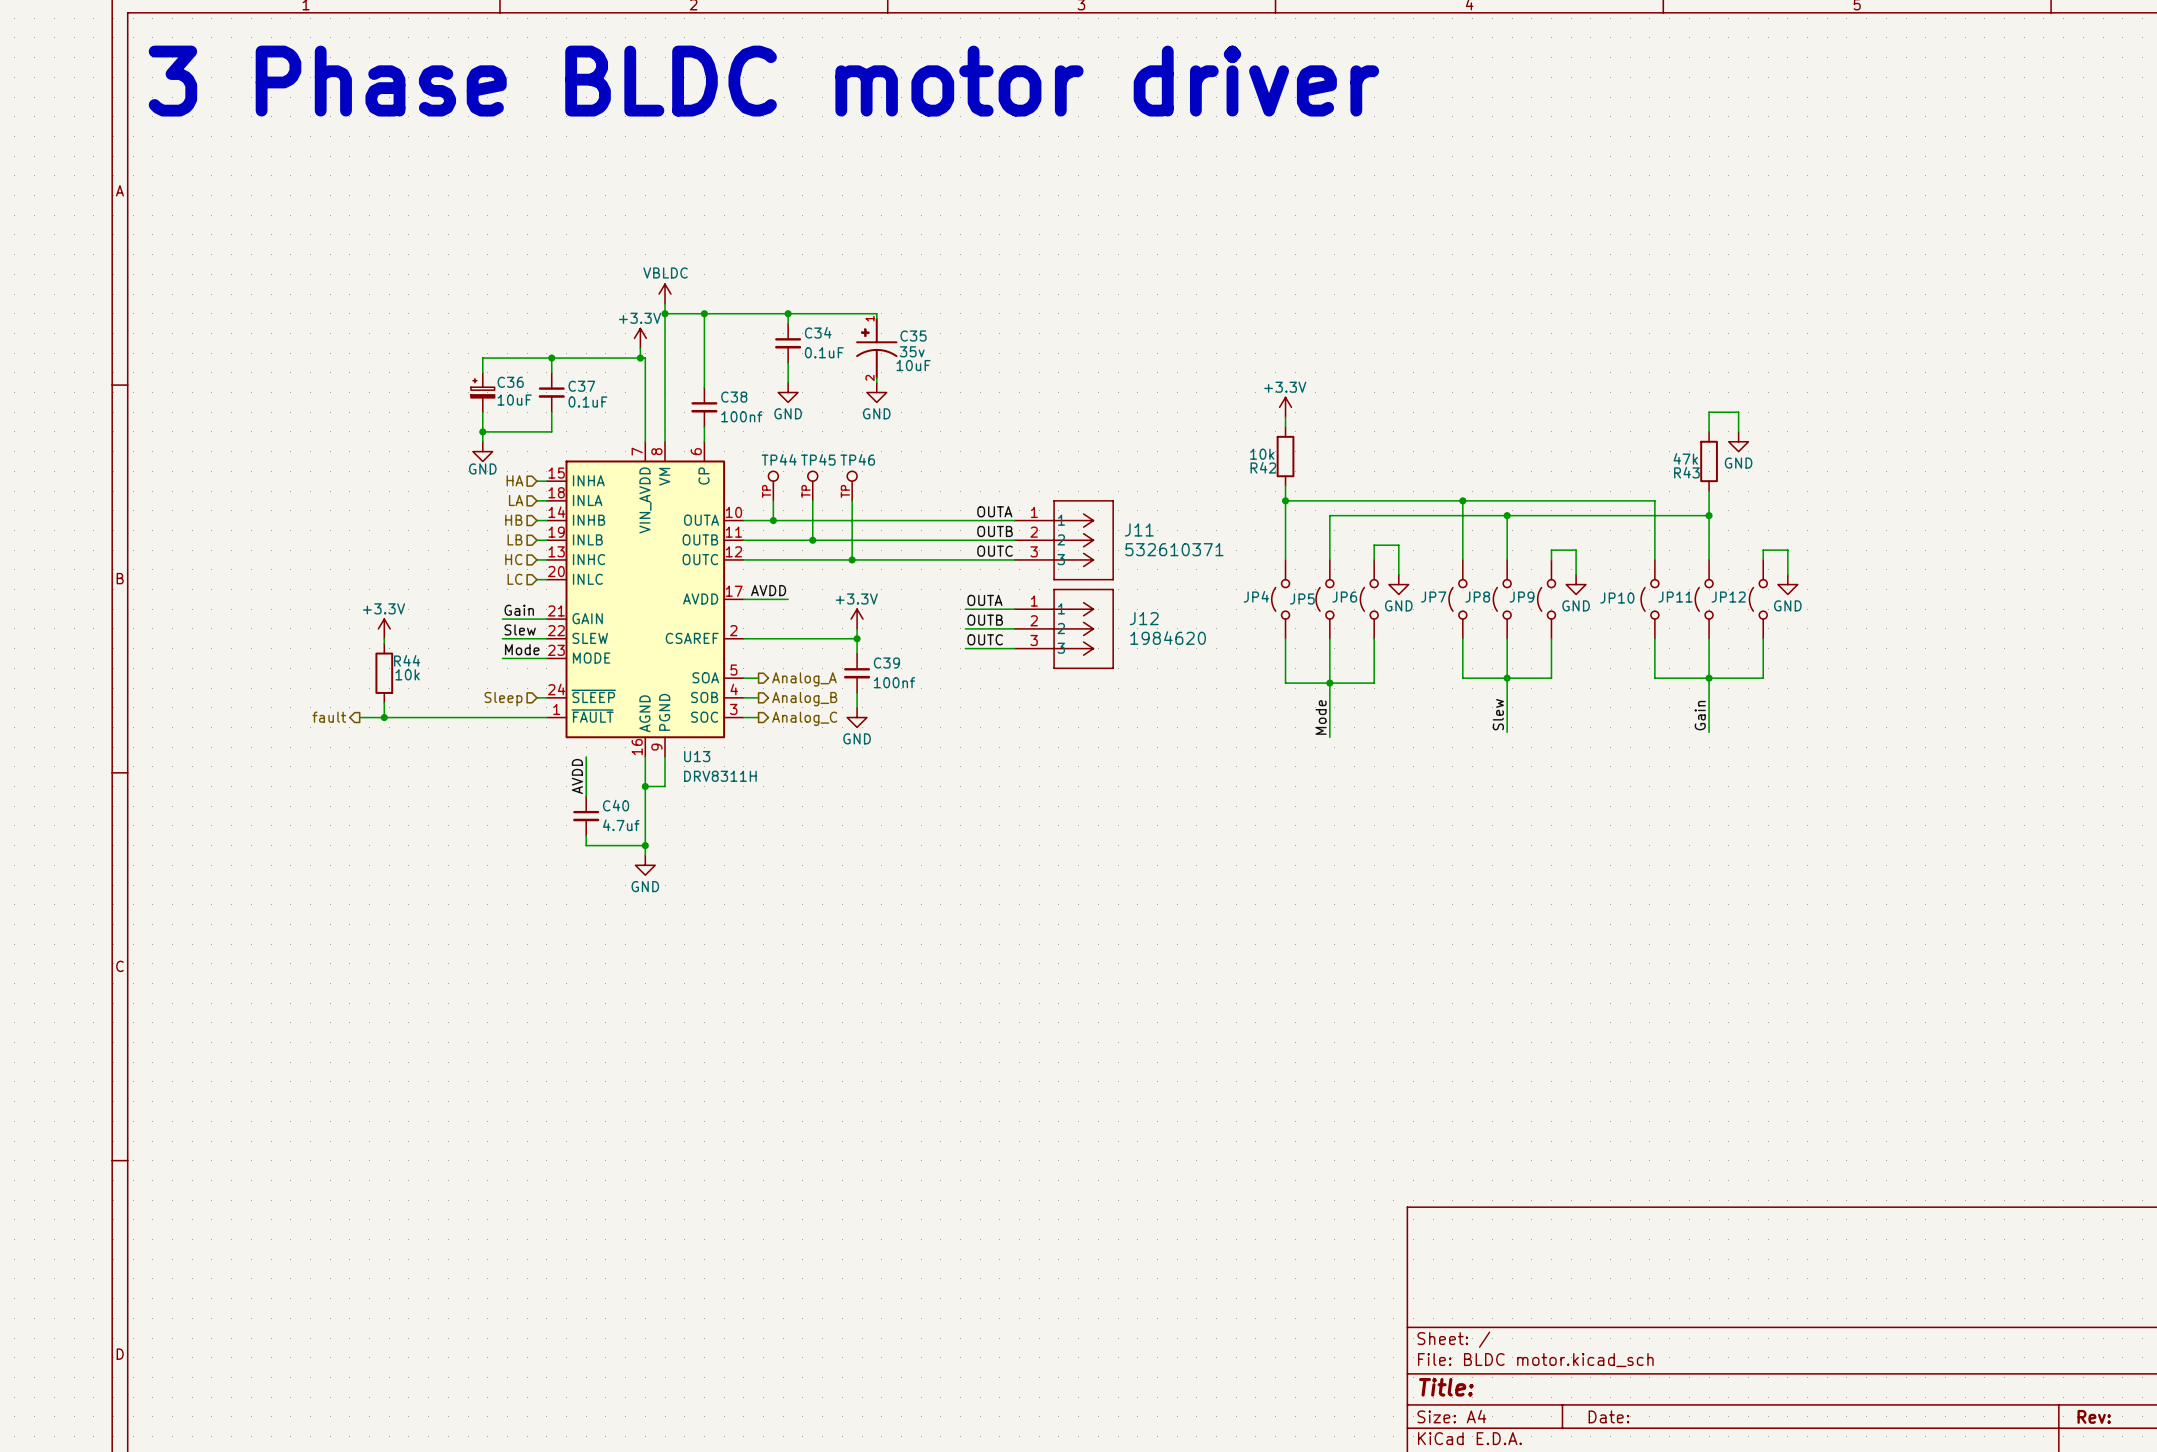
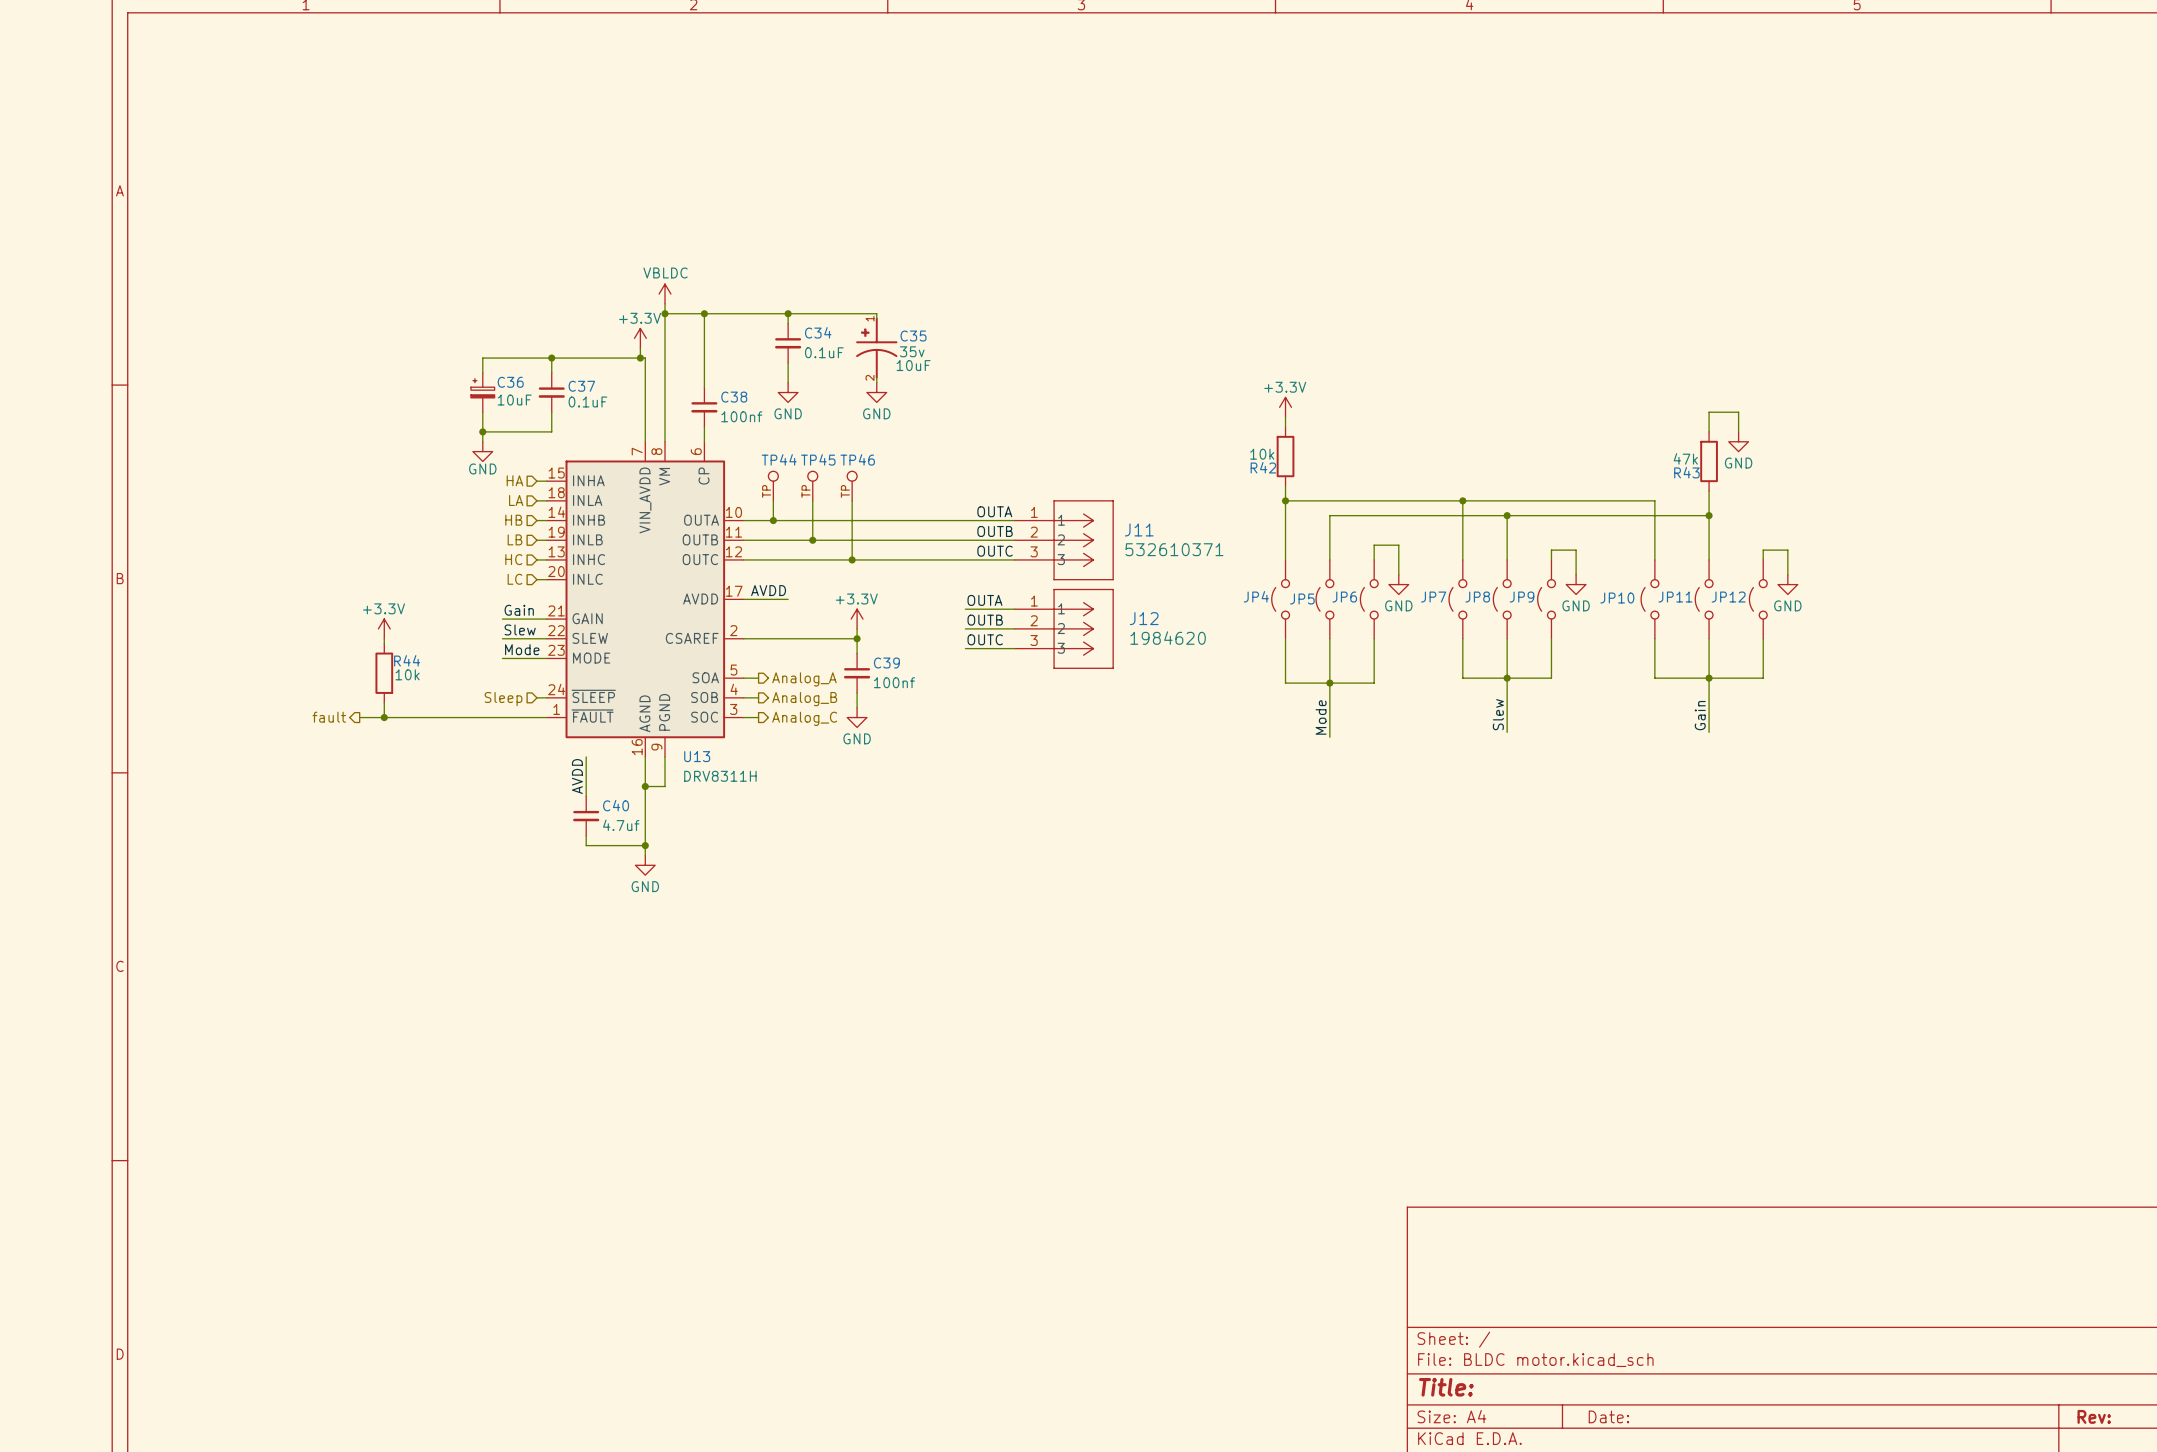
text: 3 Phase BLDC motor driver (763, 81) -> none

